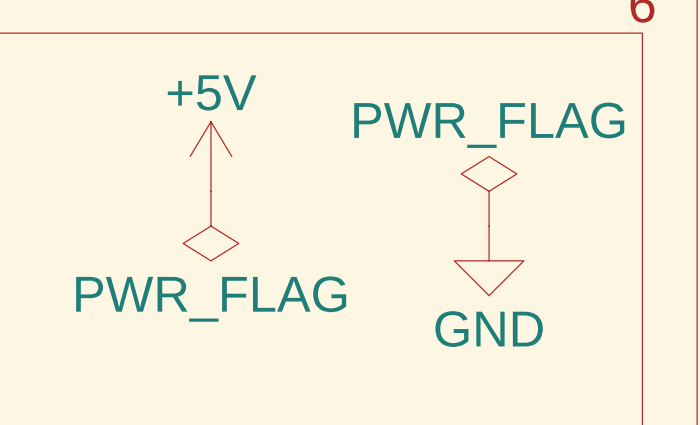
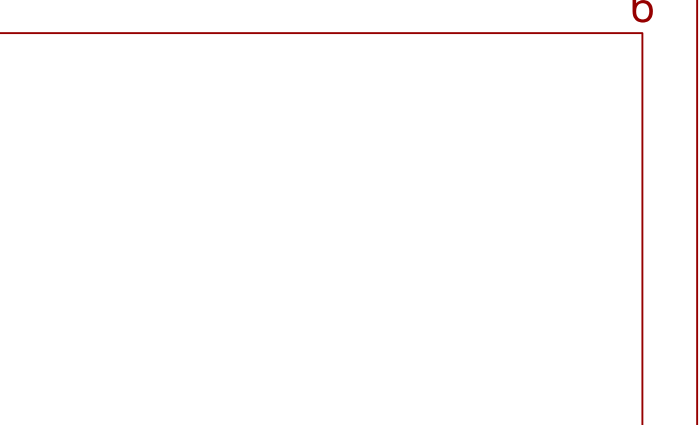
power symbol: +5V (210, 156) -> none
power symbol: PWR_FLAG (489, 191) -> none
power symbol: PWR_FLAG (210, 226) -> none
power symbol: GND (489, 260) -> none

